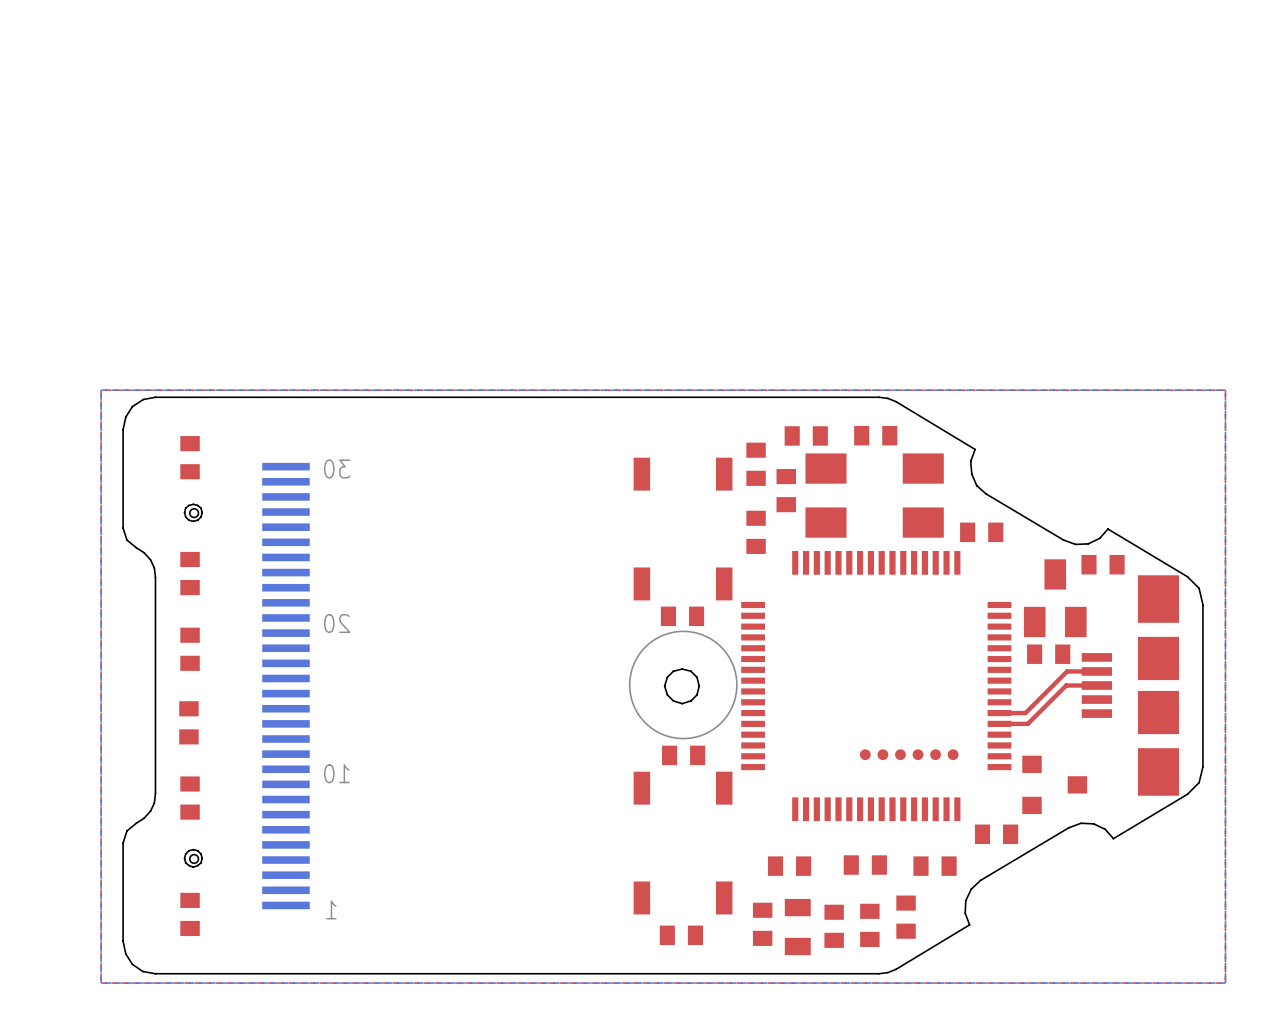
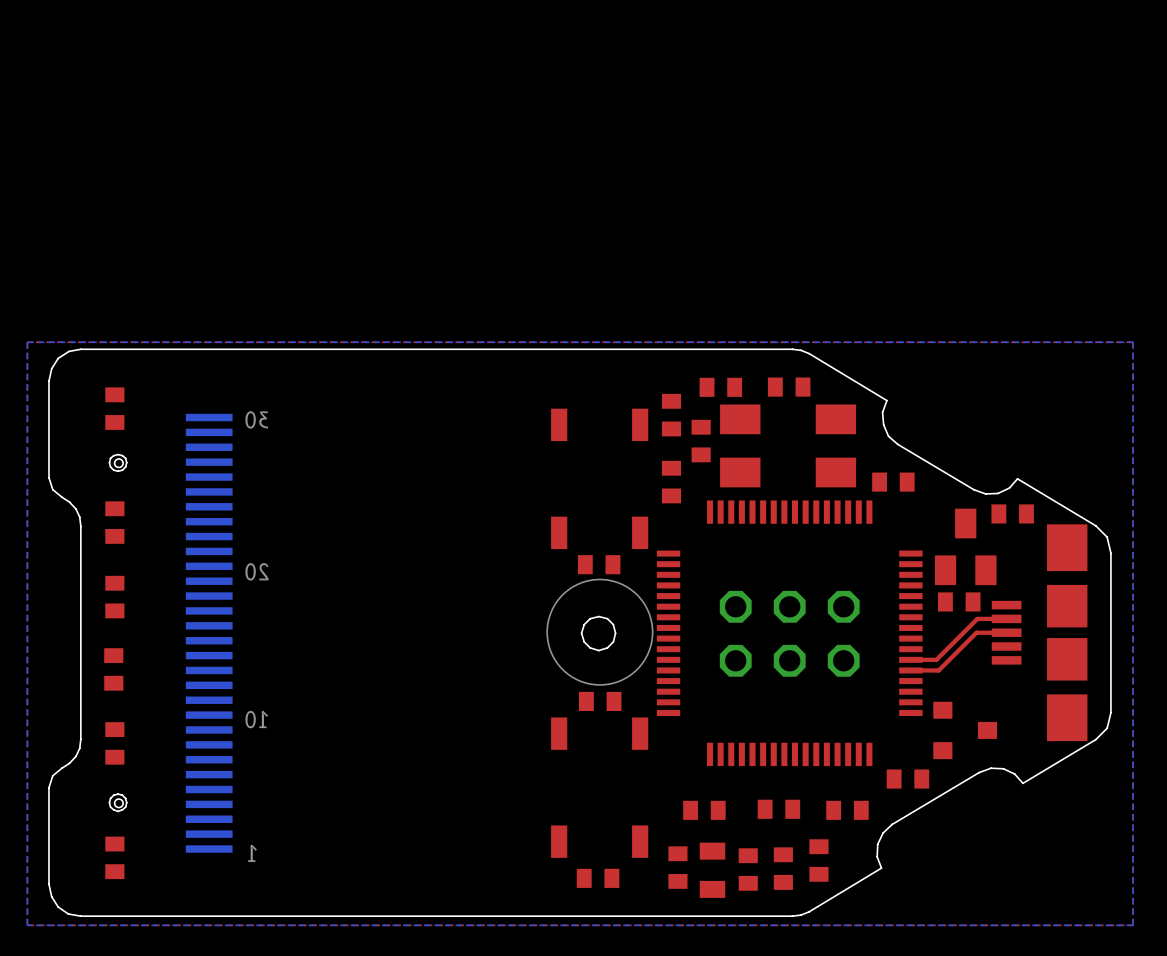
part: none -> (789, 633)
part: (865, 754) -> none
part: (882, 754) -> none
part: (900, 754) -> none
part: (918, 754) -> none
part: (935, 754) -> none
part: (953, 754) -> none

